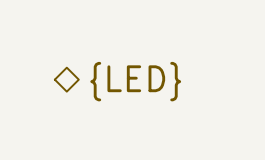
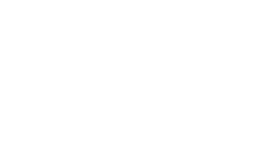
hierarchical label: {LED} (135, 81) -> none

